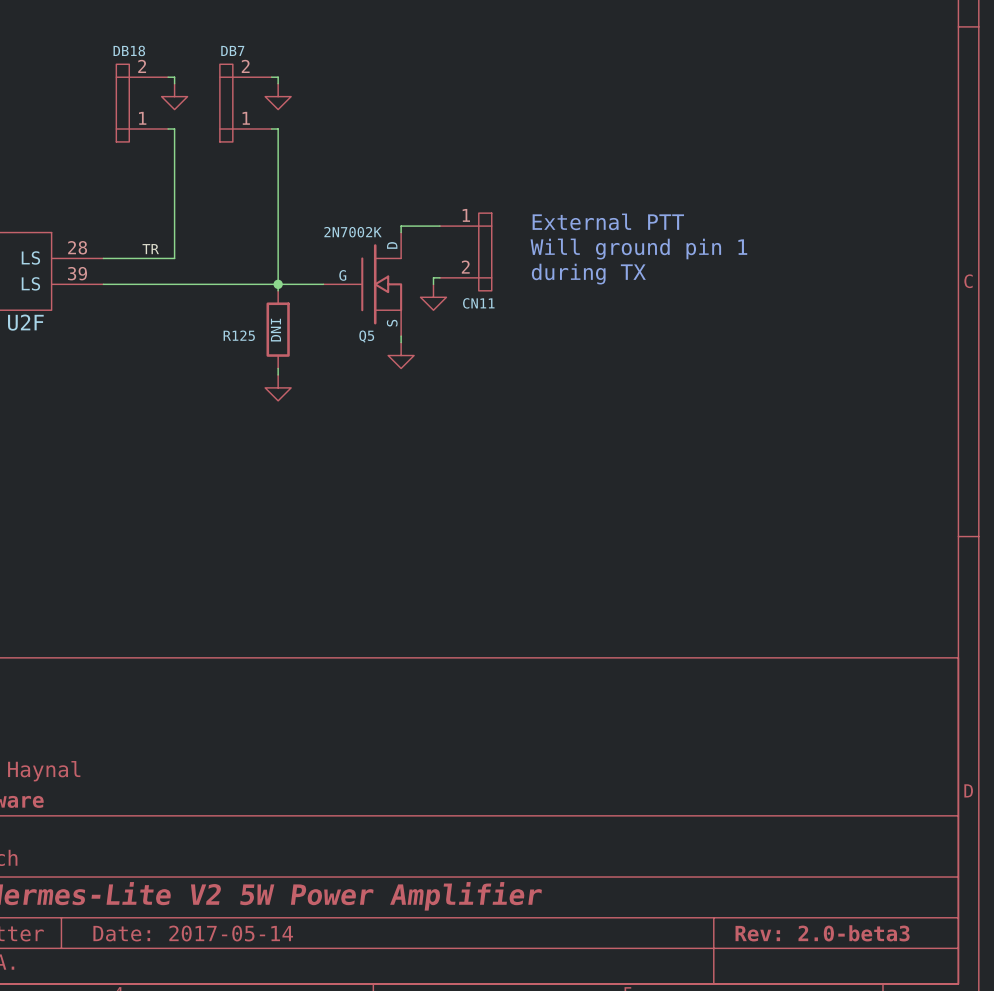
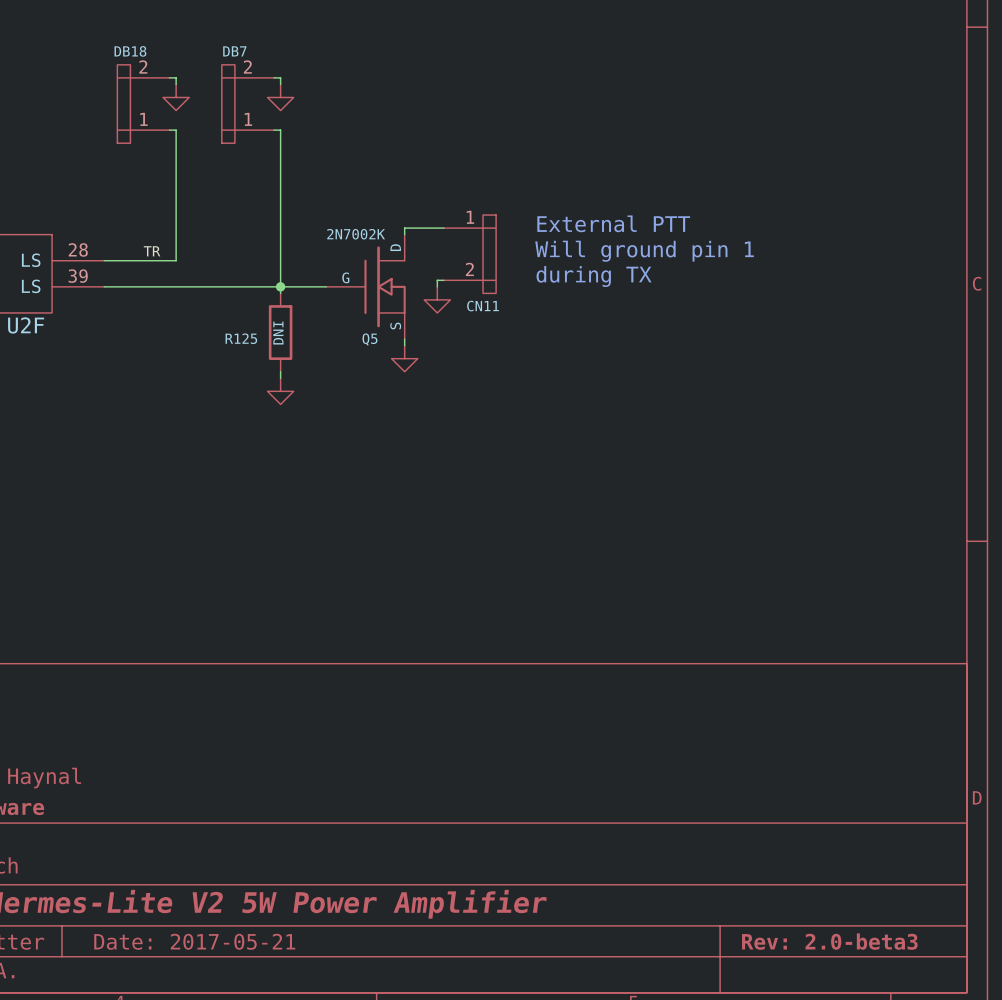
title block: Date: 2017-05-14 (193, 933) -> Date: 2017-05-21 (194, 941)

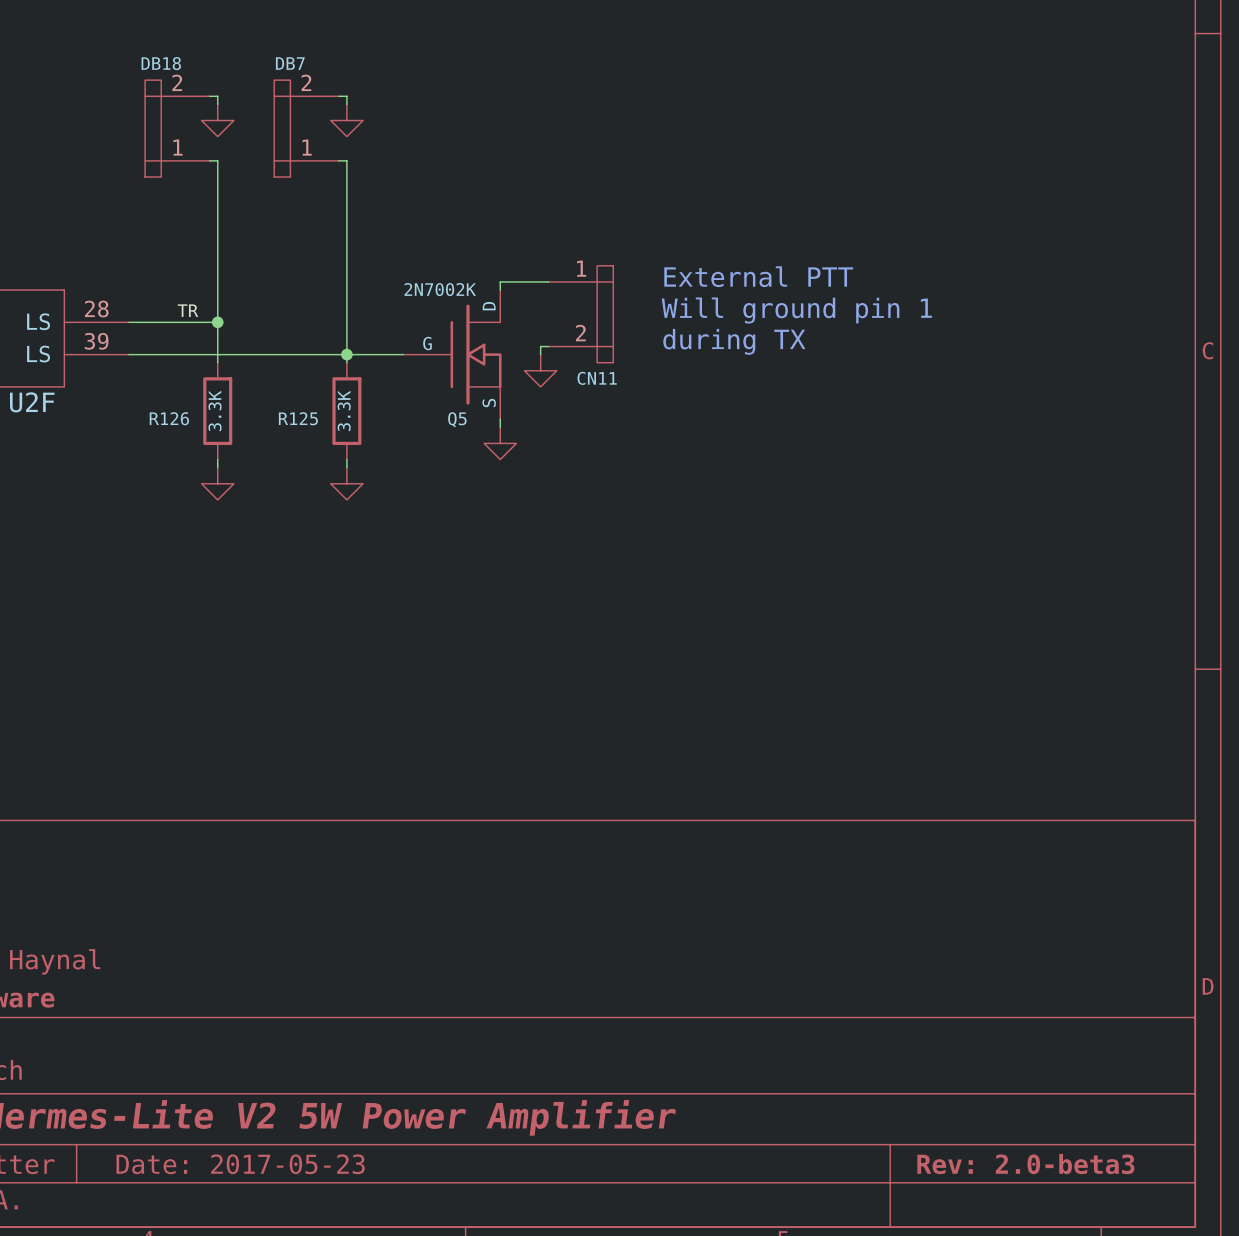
wire: none -> (217, 322) (217, 362)
junction: none -> (217, 322)
R126: none -> 3.3K (217, 411)
R125 value: DNI (278, 333) -> 3.3K (344, 410)
wire: none -> (217, 459) (217, 467)
power symbol: none -> (217, 483)
title block: Date: 2017-05-21 (194, 941) -> Date: 2017-05-23 (240, 1164)

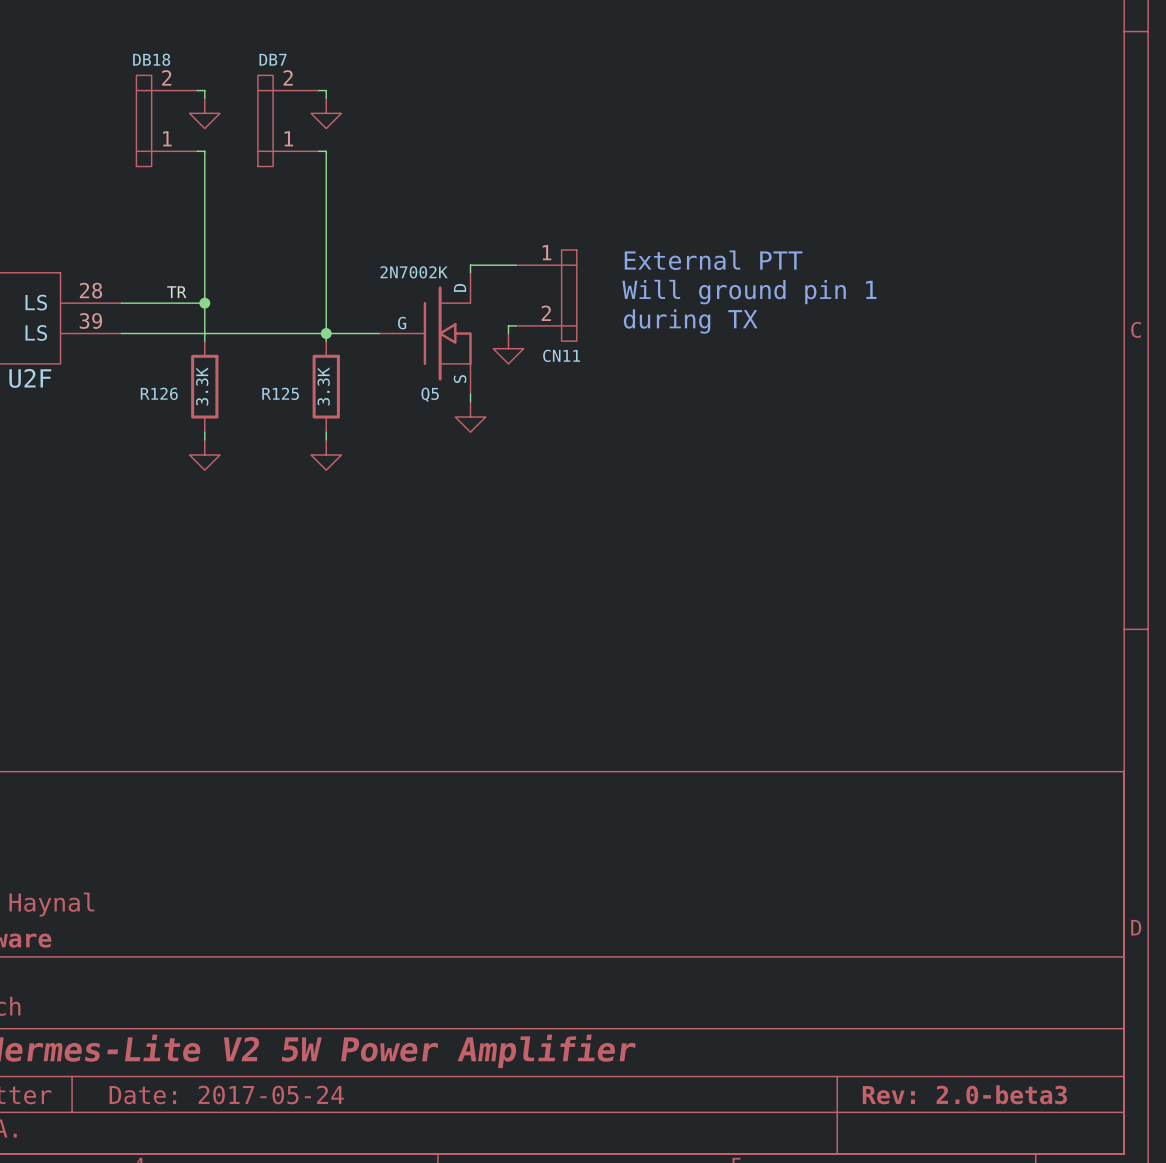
title block: Date: 2017-05-23 (240, 1164) -> Date: 2017-05-24 (226, 1094)

